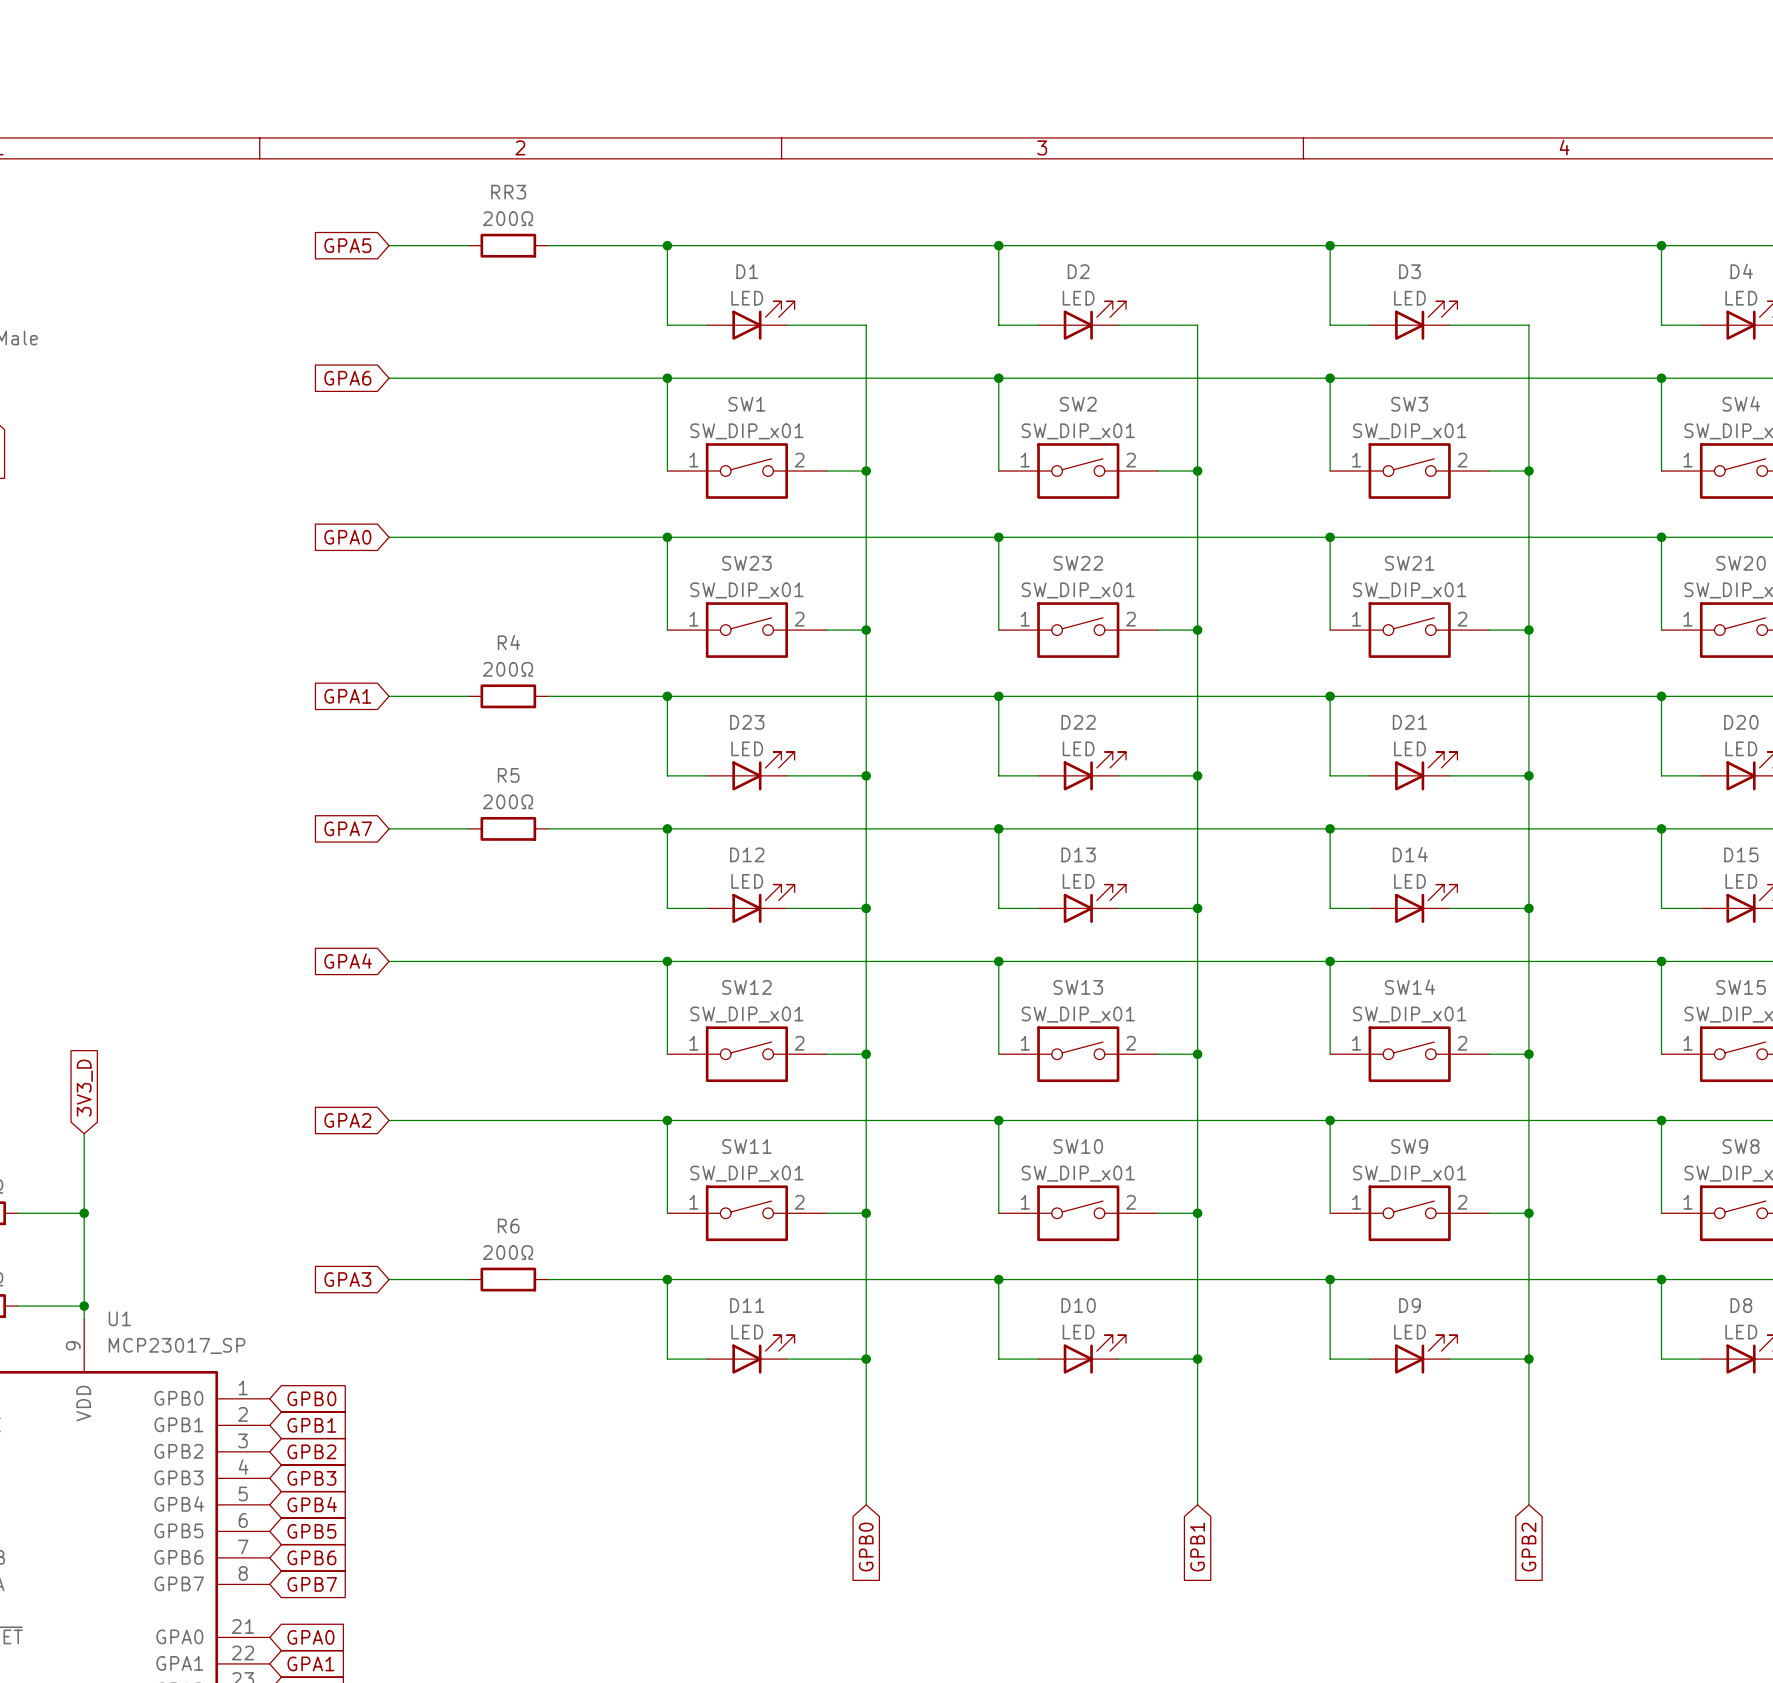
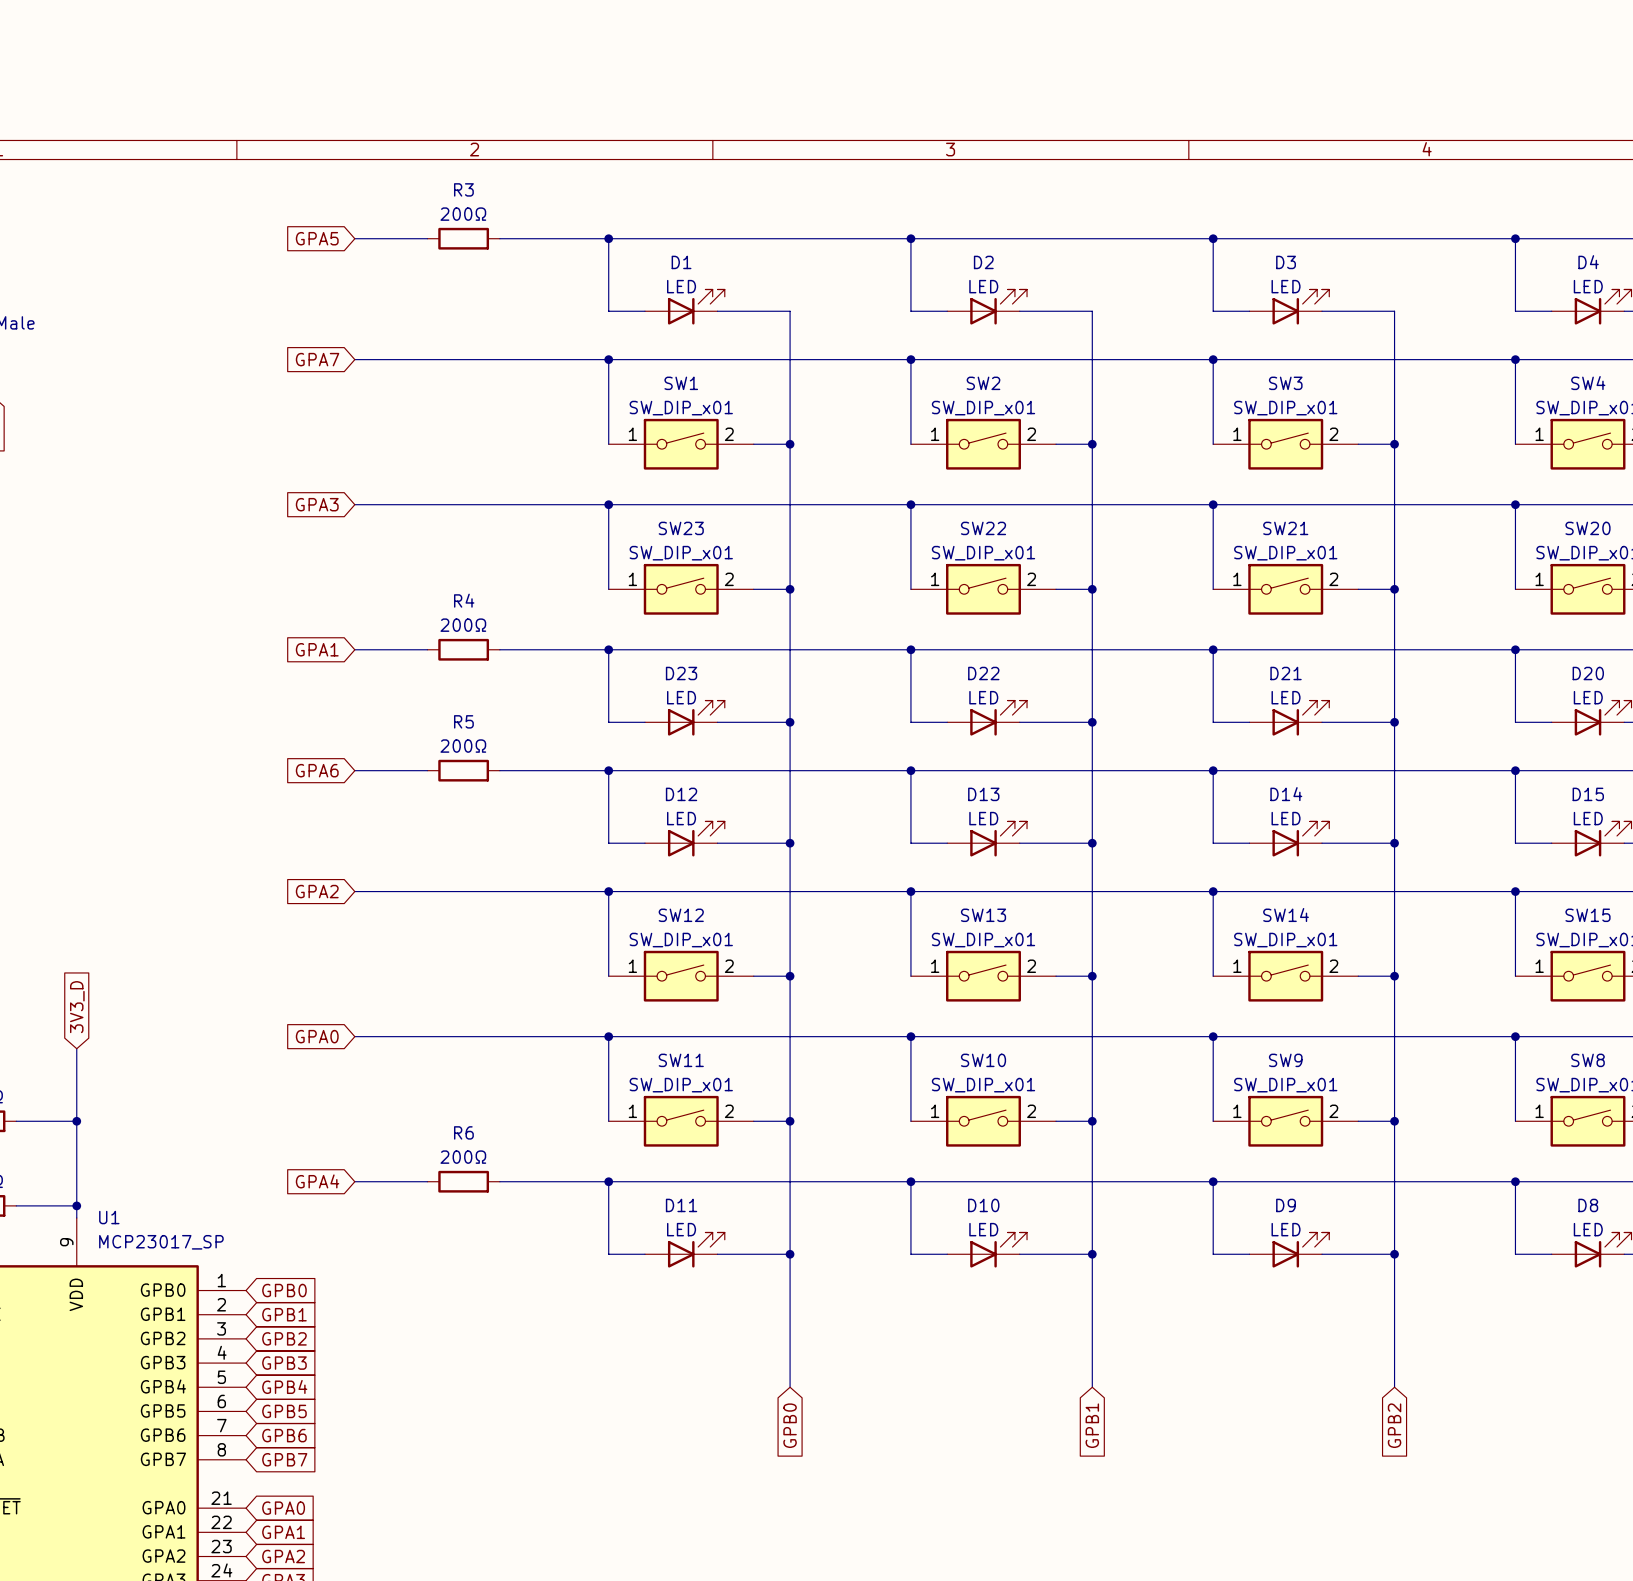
RR3 name: RR3 (508, 192) -> R3 (463, 189)
global label: GPA6 (347, 378) -> GPA7 (317, 359)
global label: GPA0 (347, 537) -> GPA3 (317, 504)
global label: GPA7 (348, 828) -> GPA6 (317, 770)
global label: GPA4 (348, 961) -> GPA2 (317, 891)
global label: GPA2 (347, 1120) -> GPA0 (317, 1036)
global label: GPA3 (347, 1279) -> GPA4 (317, 1181)

